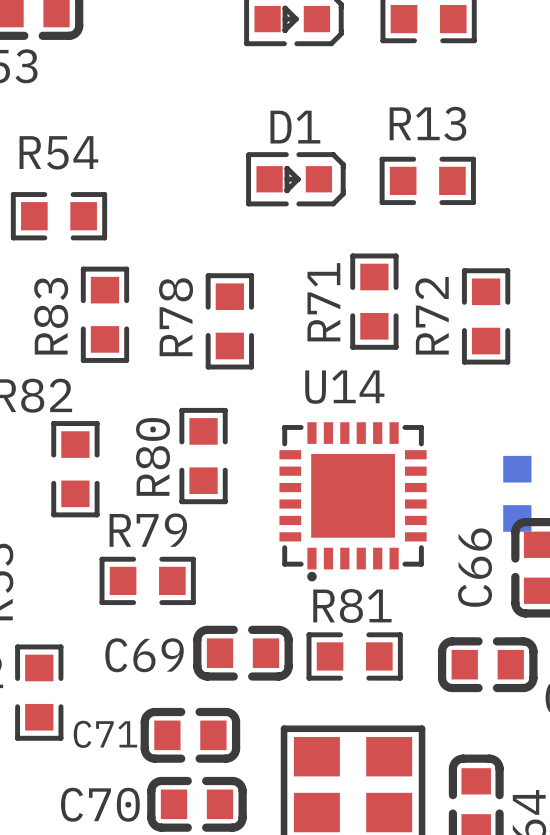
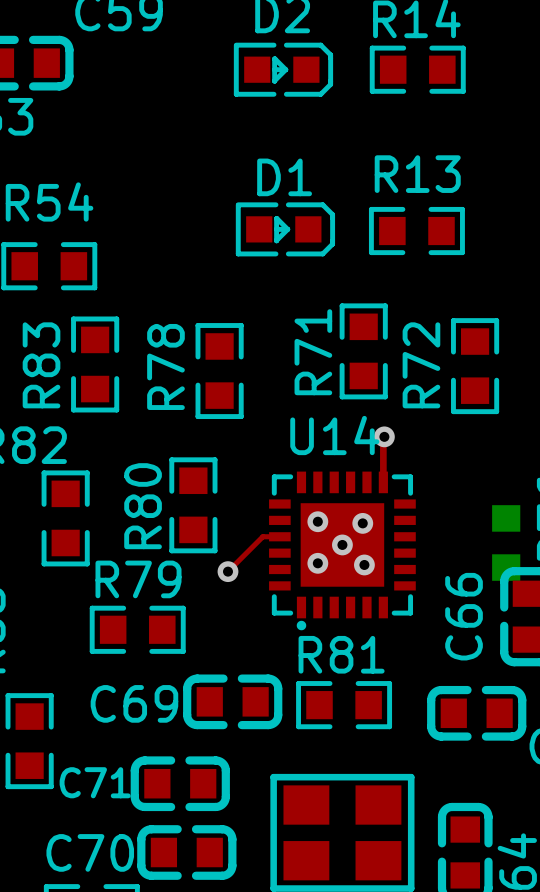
top track: none -> (384, 436) (383, 482)
via: none -> (384, 436)
via: none -> (317, 521)
via: none -> (362, 523)
top track: none -> (279, 536) (262, 536) (227, 571)
via: none -> (342, 544)
via: none -> (317, 563)
via: none -> (364, 564)
via: none -> (227, 571)

